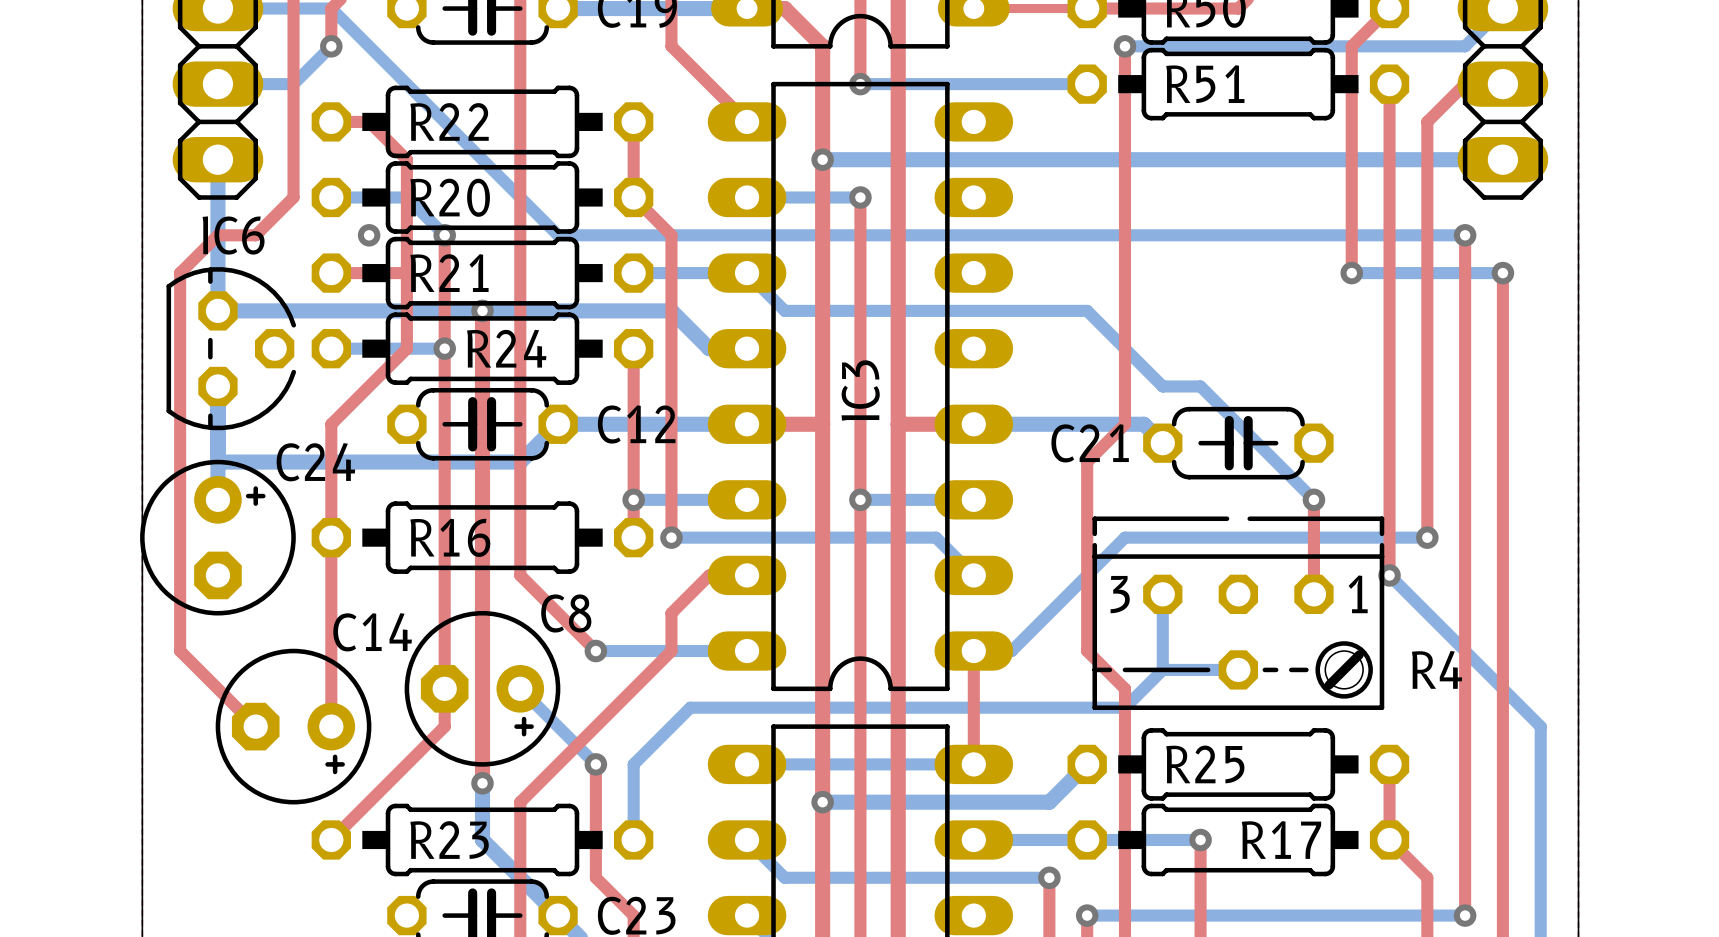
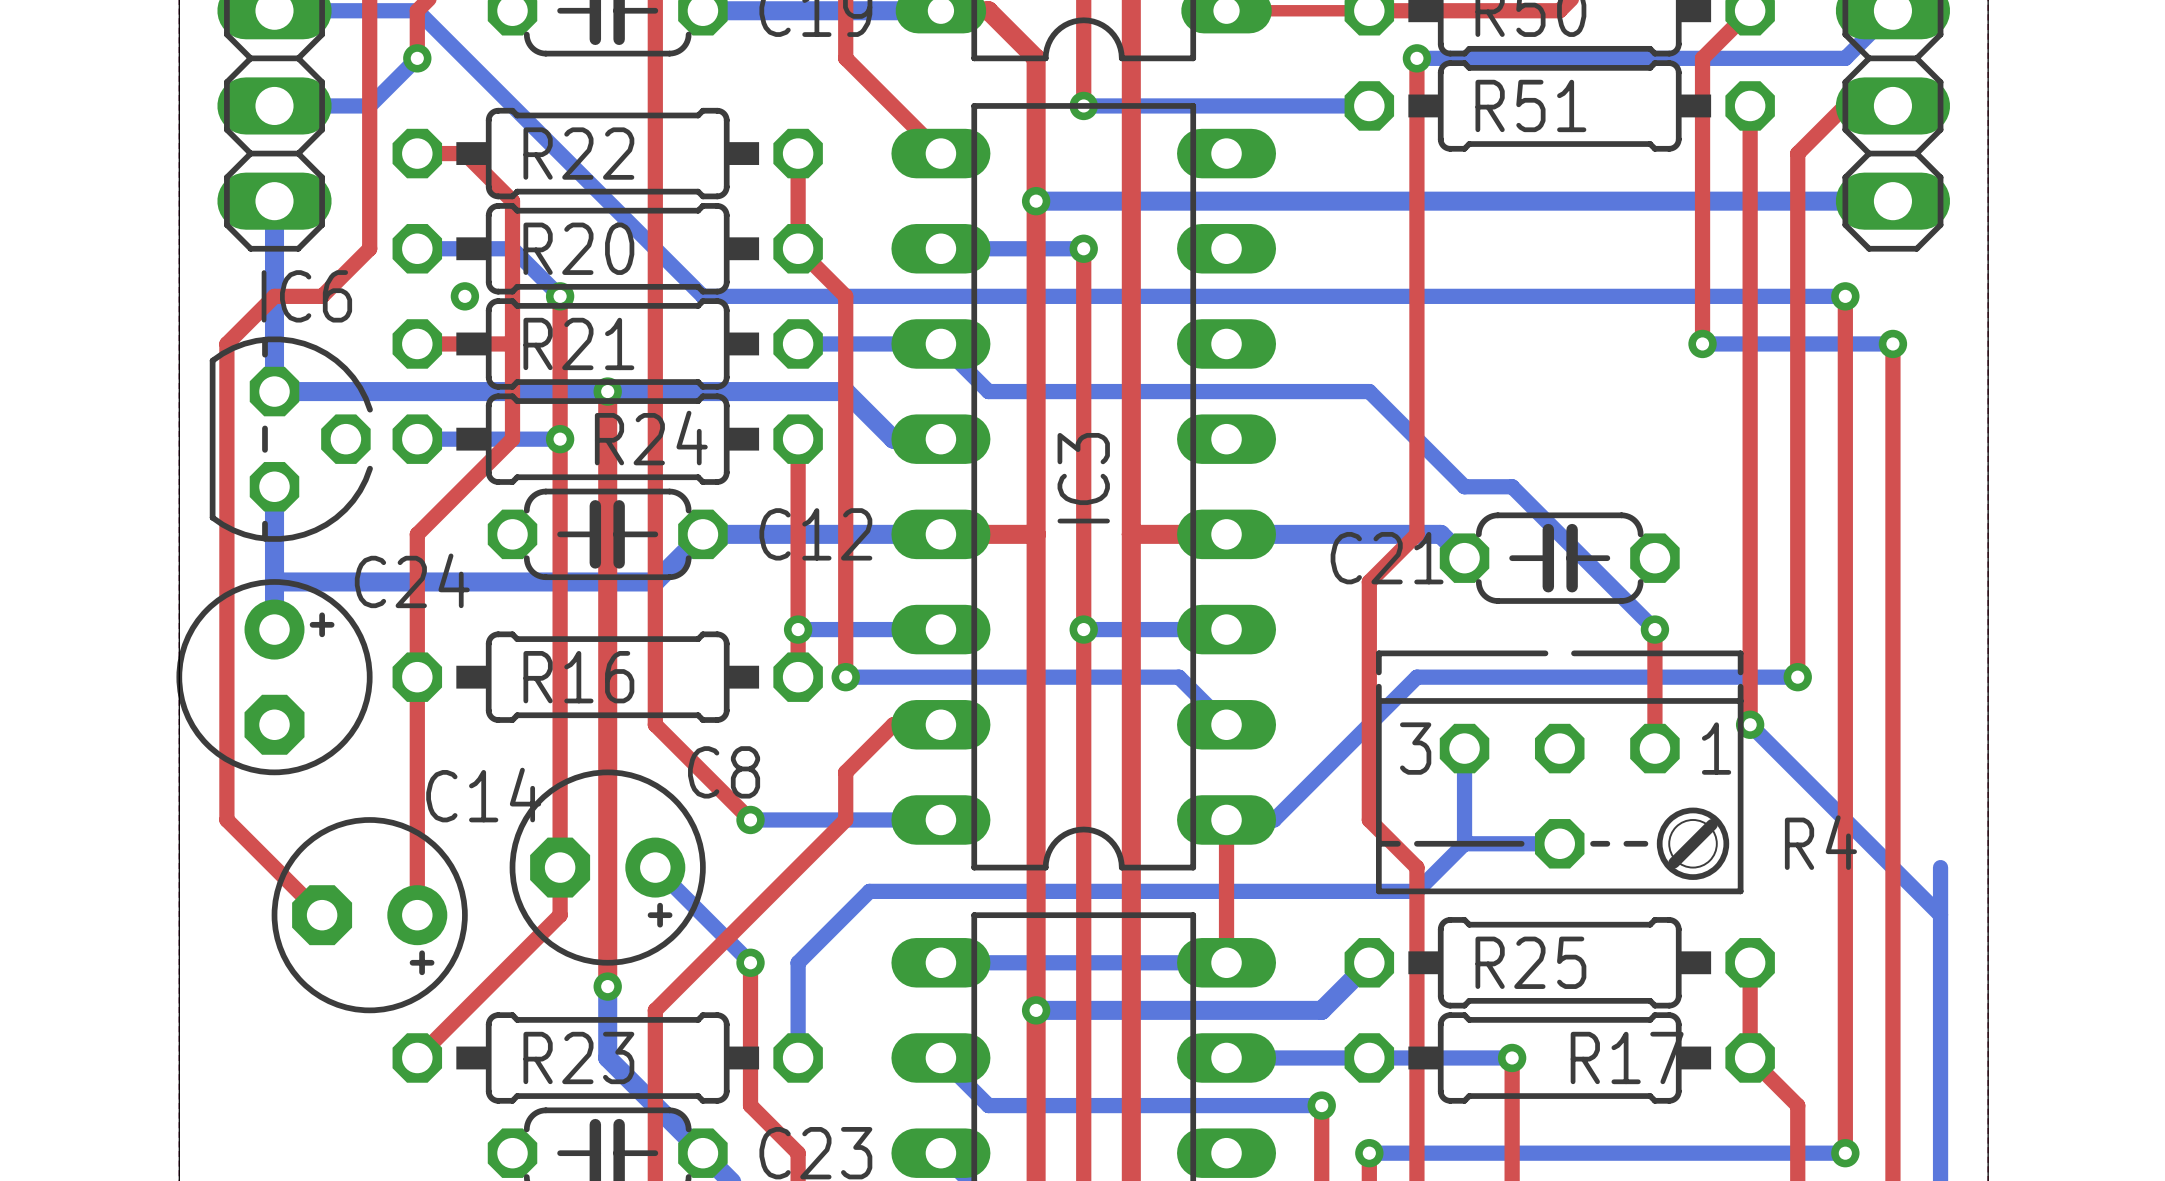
bottom track: none -> (1940, 867) (1940, 915)

